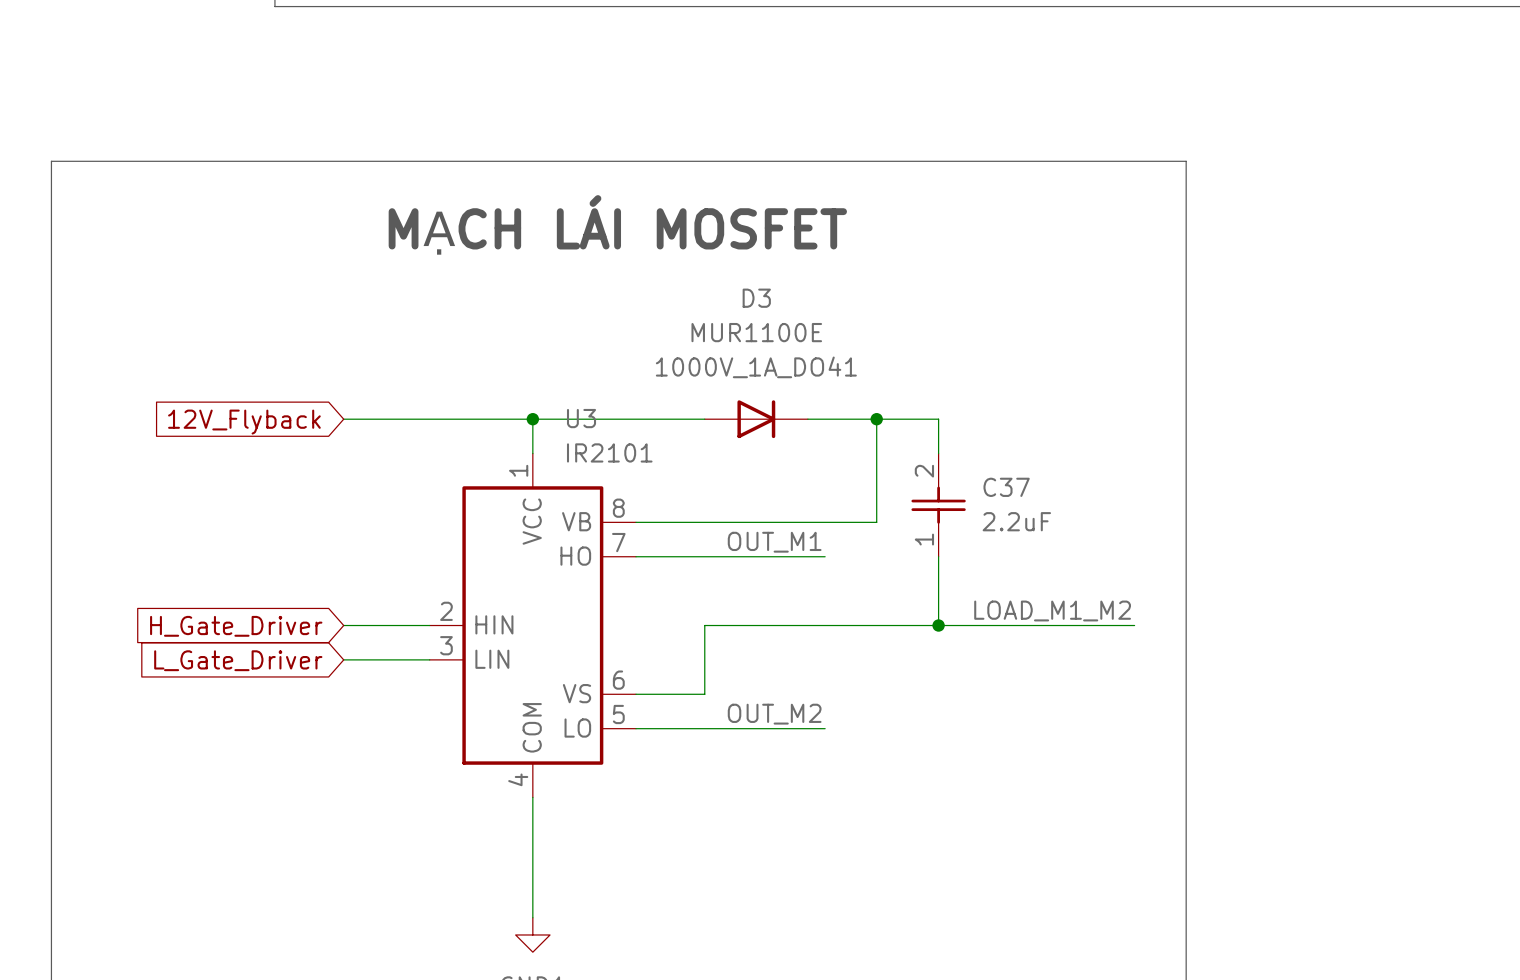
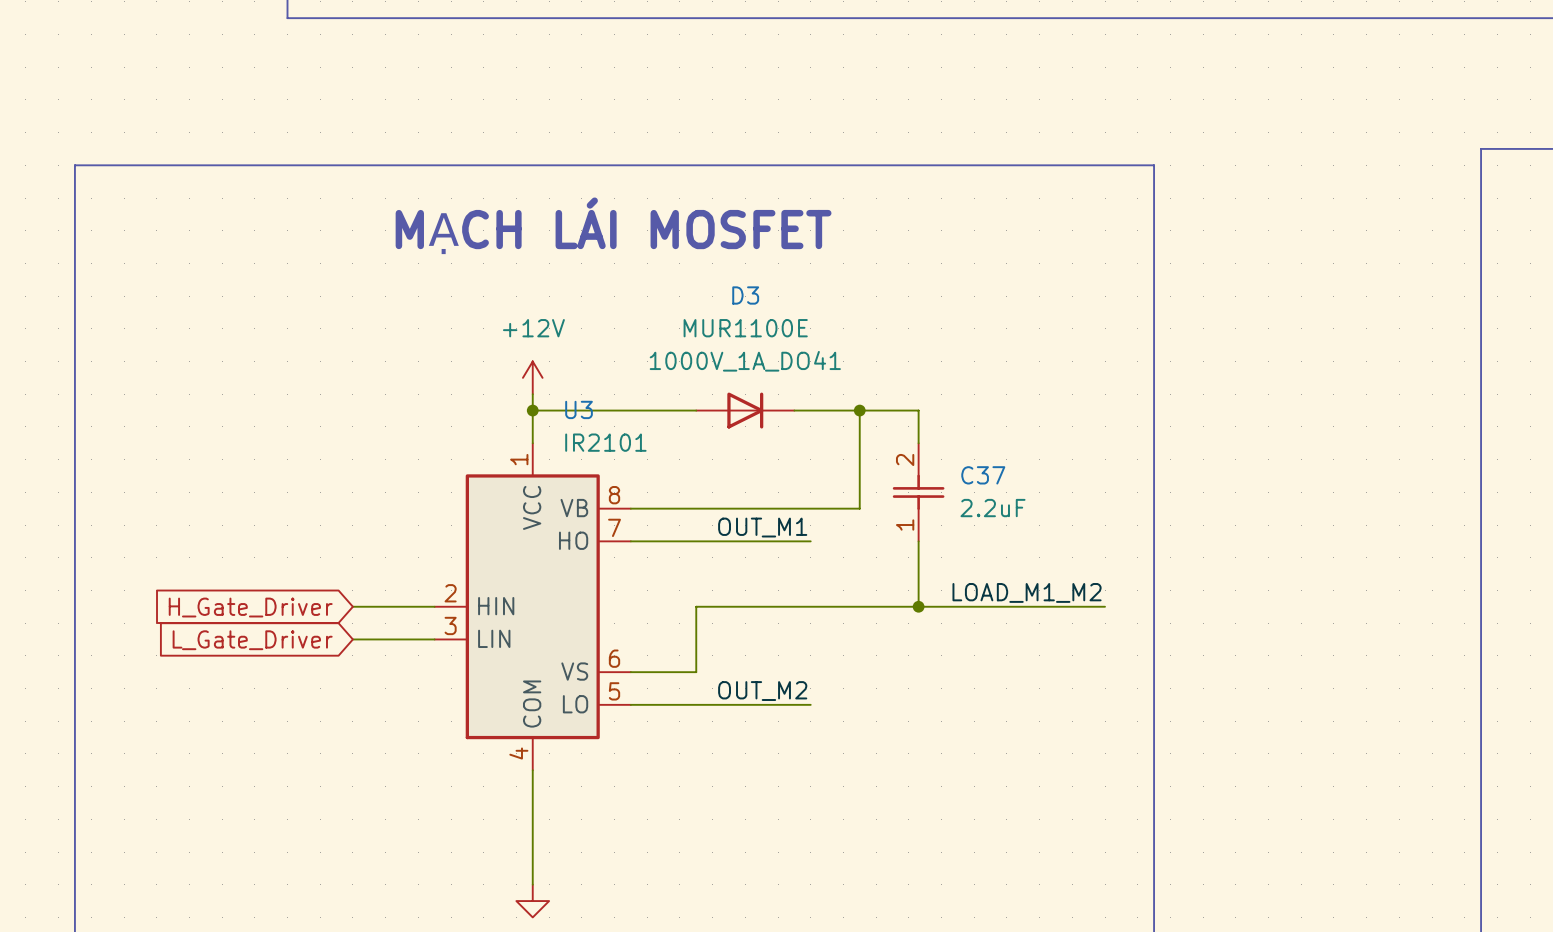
power symbol: none -> +12V (532, 377)
wire: (343, 419) (532, 419) -> (532, 394) (532, 410)
global label: 12V_Flyback (244, 422) -> none

